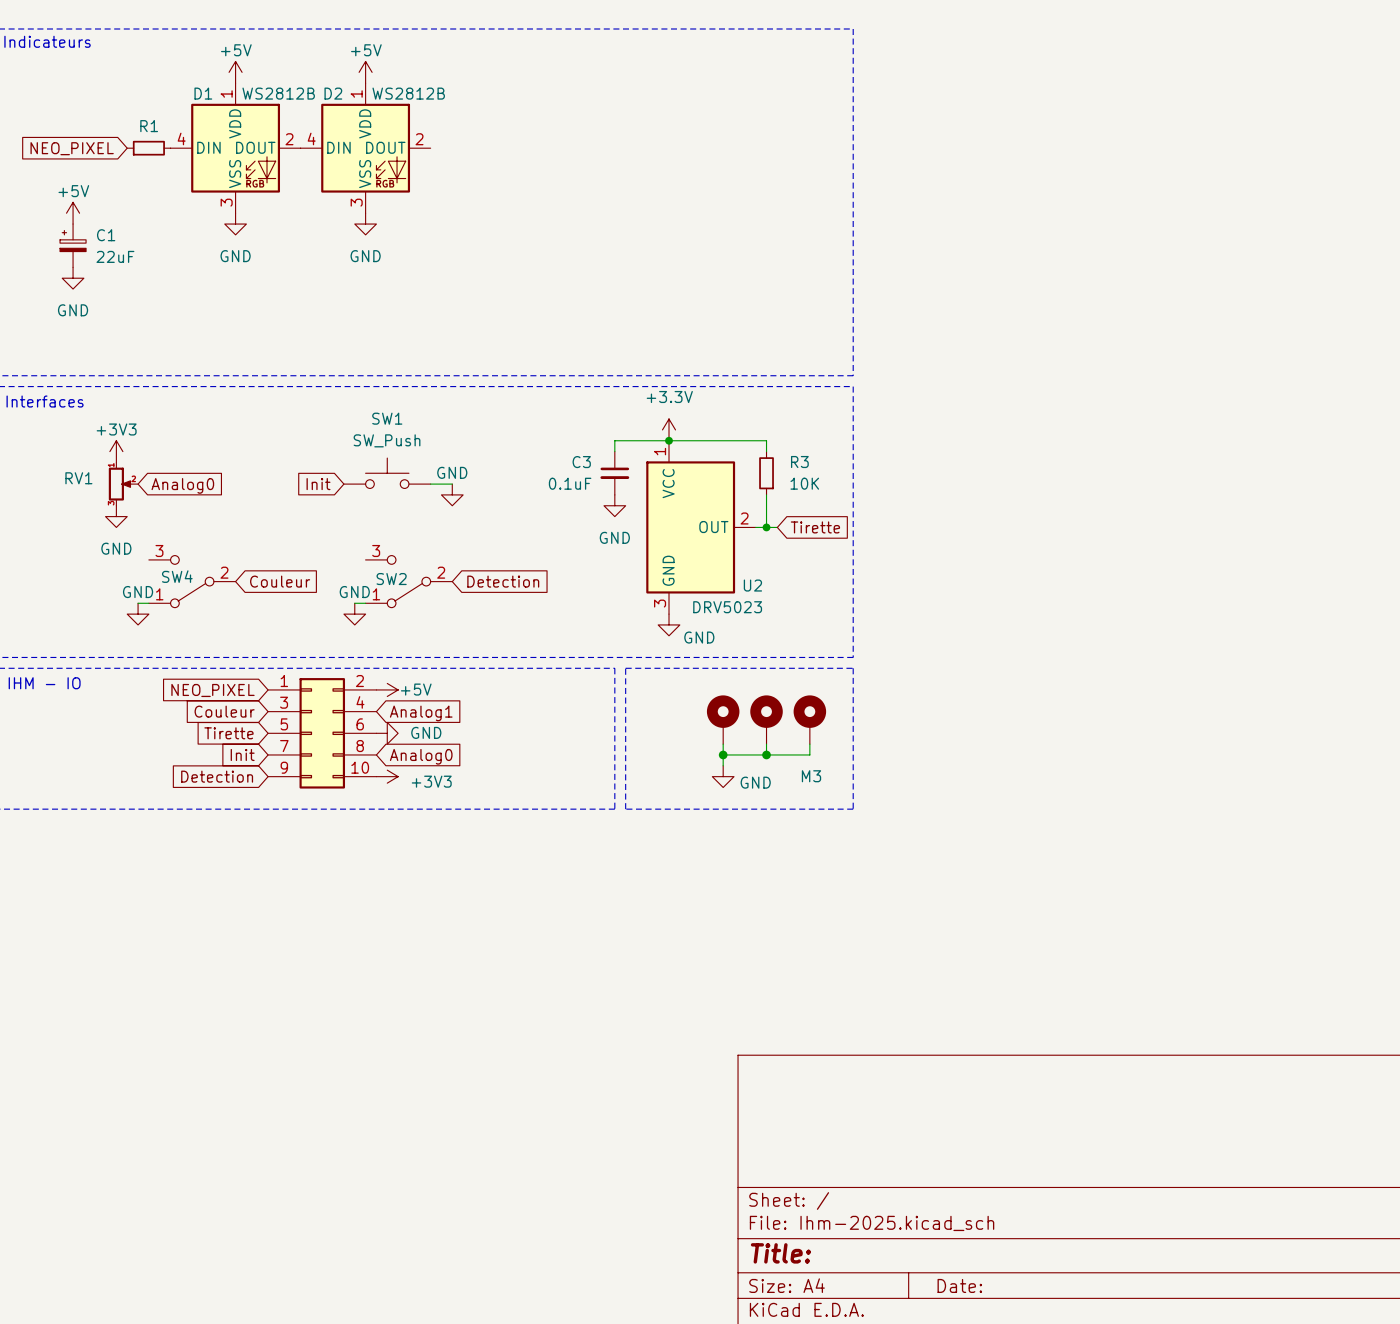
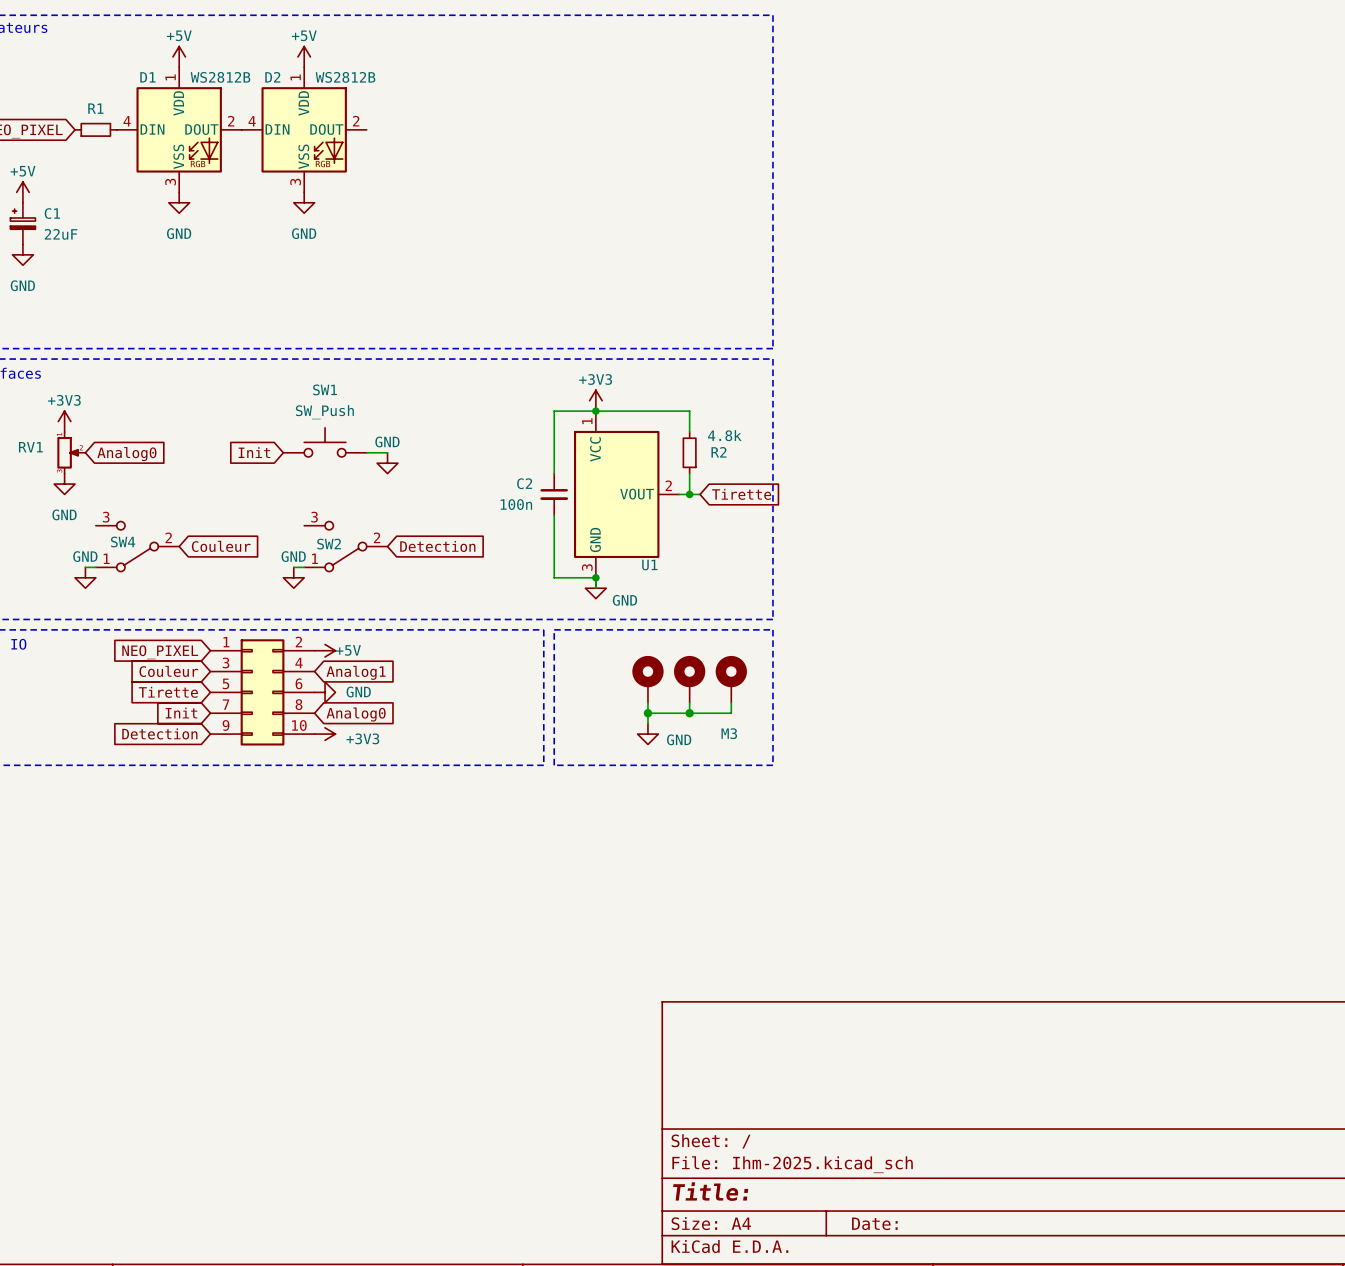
power symbol: +3.3V (669, 429) -> +3V3 (595, 400)
wire: (625, 440) (614, 440) (614, 451) -> (554, 411) (554, 473)
C3: 0.1uF (614, 473) -> none
R3: 10K (766, 473) -> none
R2: none -> 4.8k (689, 452)
power symbol: GND (614, 505) -> none
C2: none -> 100n (554, 494)
U2 pin name: OUT (713, 527) -> VOUT (637, 494)
wire: none -> (554, 515) (554, 577) (595, 577) (595, 588)
U2 name: U2 (752, 585) -> U1 (649, 565)
U2 value: DRV5023 (727, 607) -> none
junction: none -> (595, 577)

